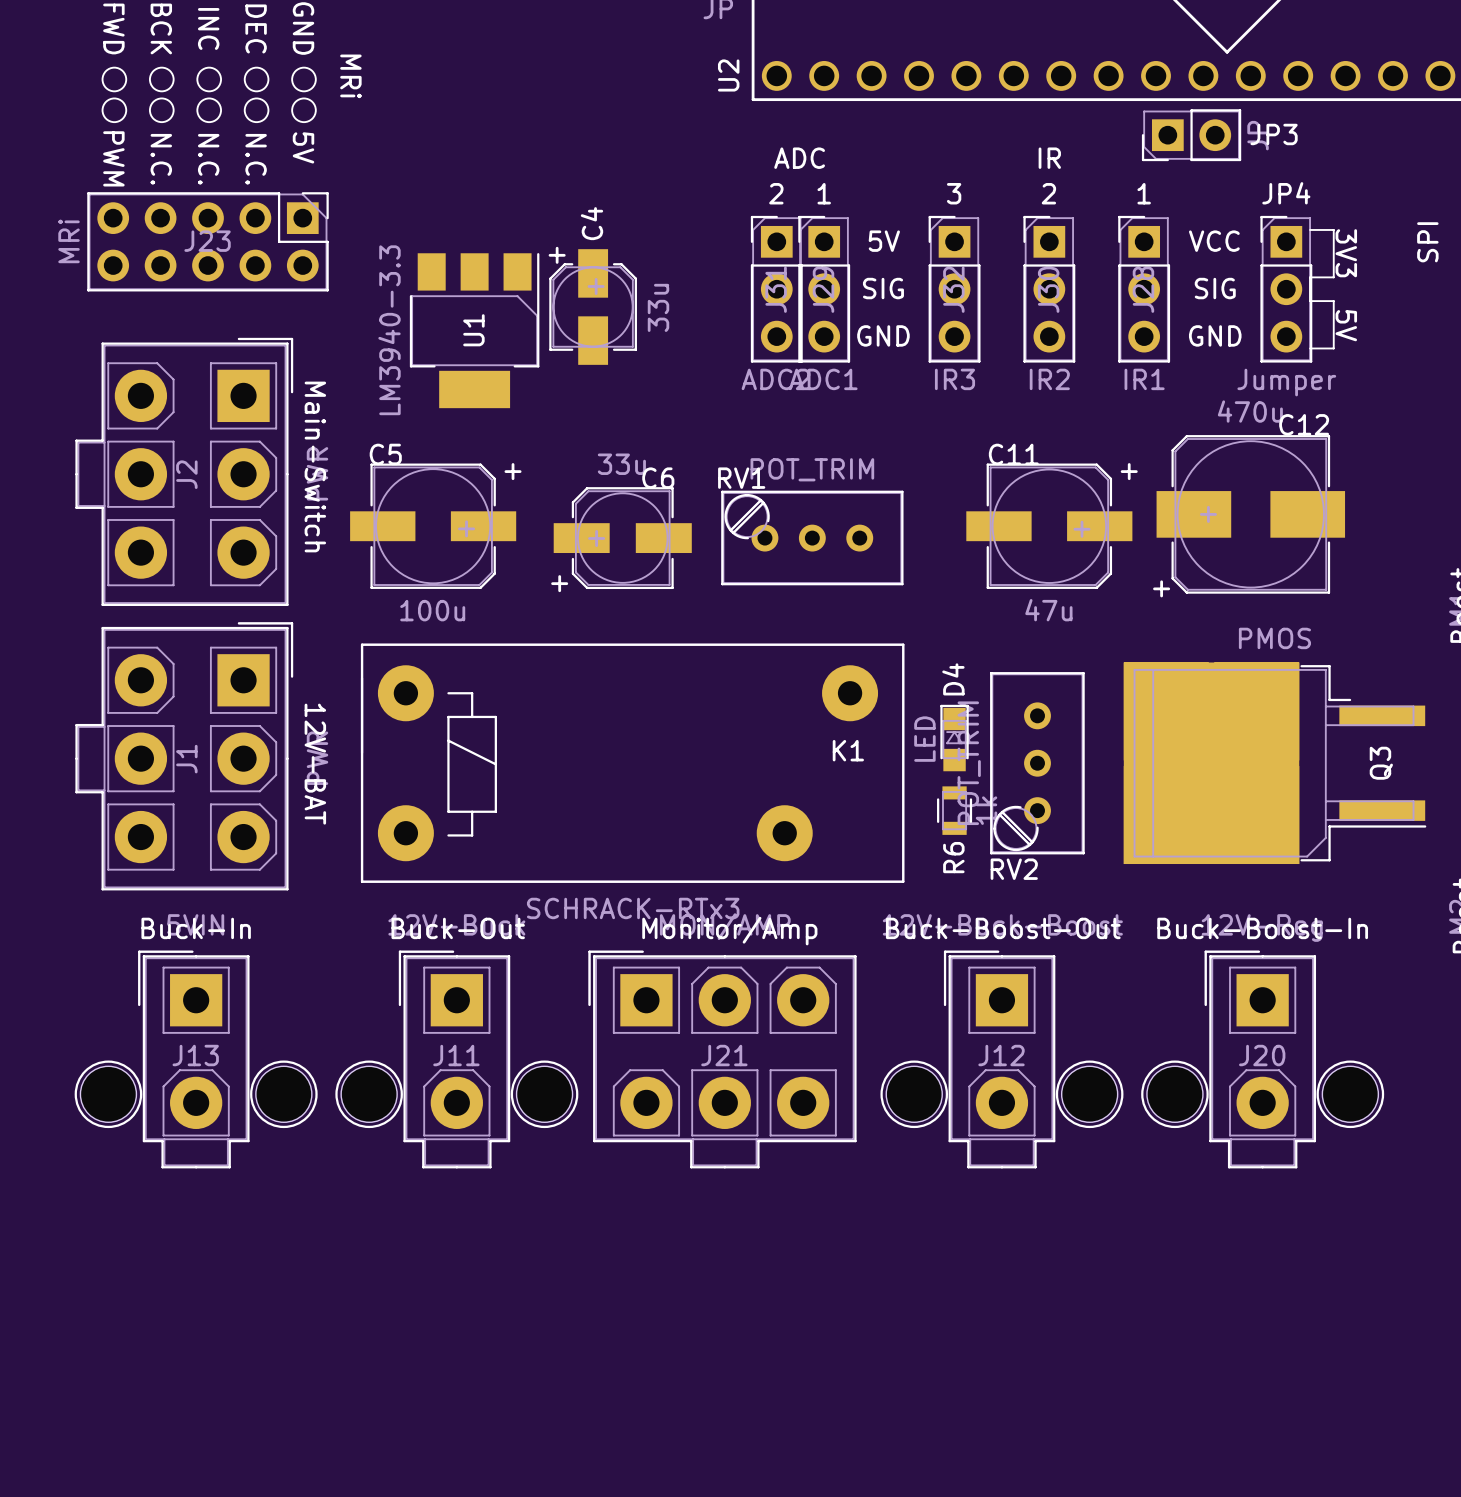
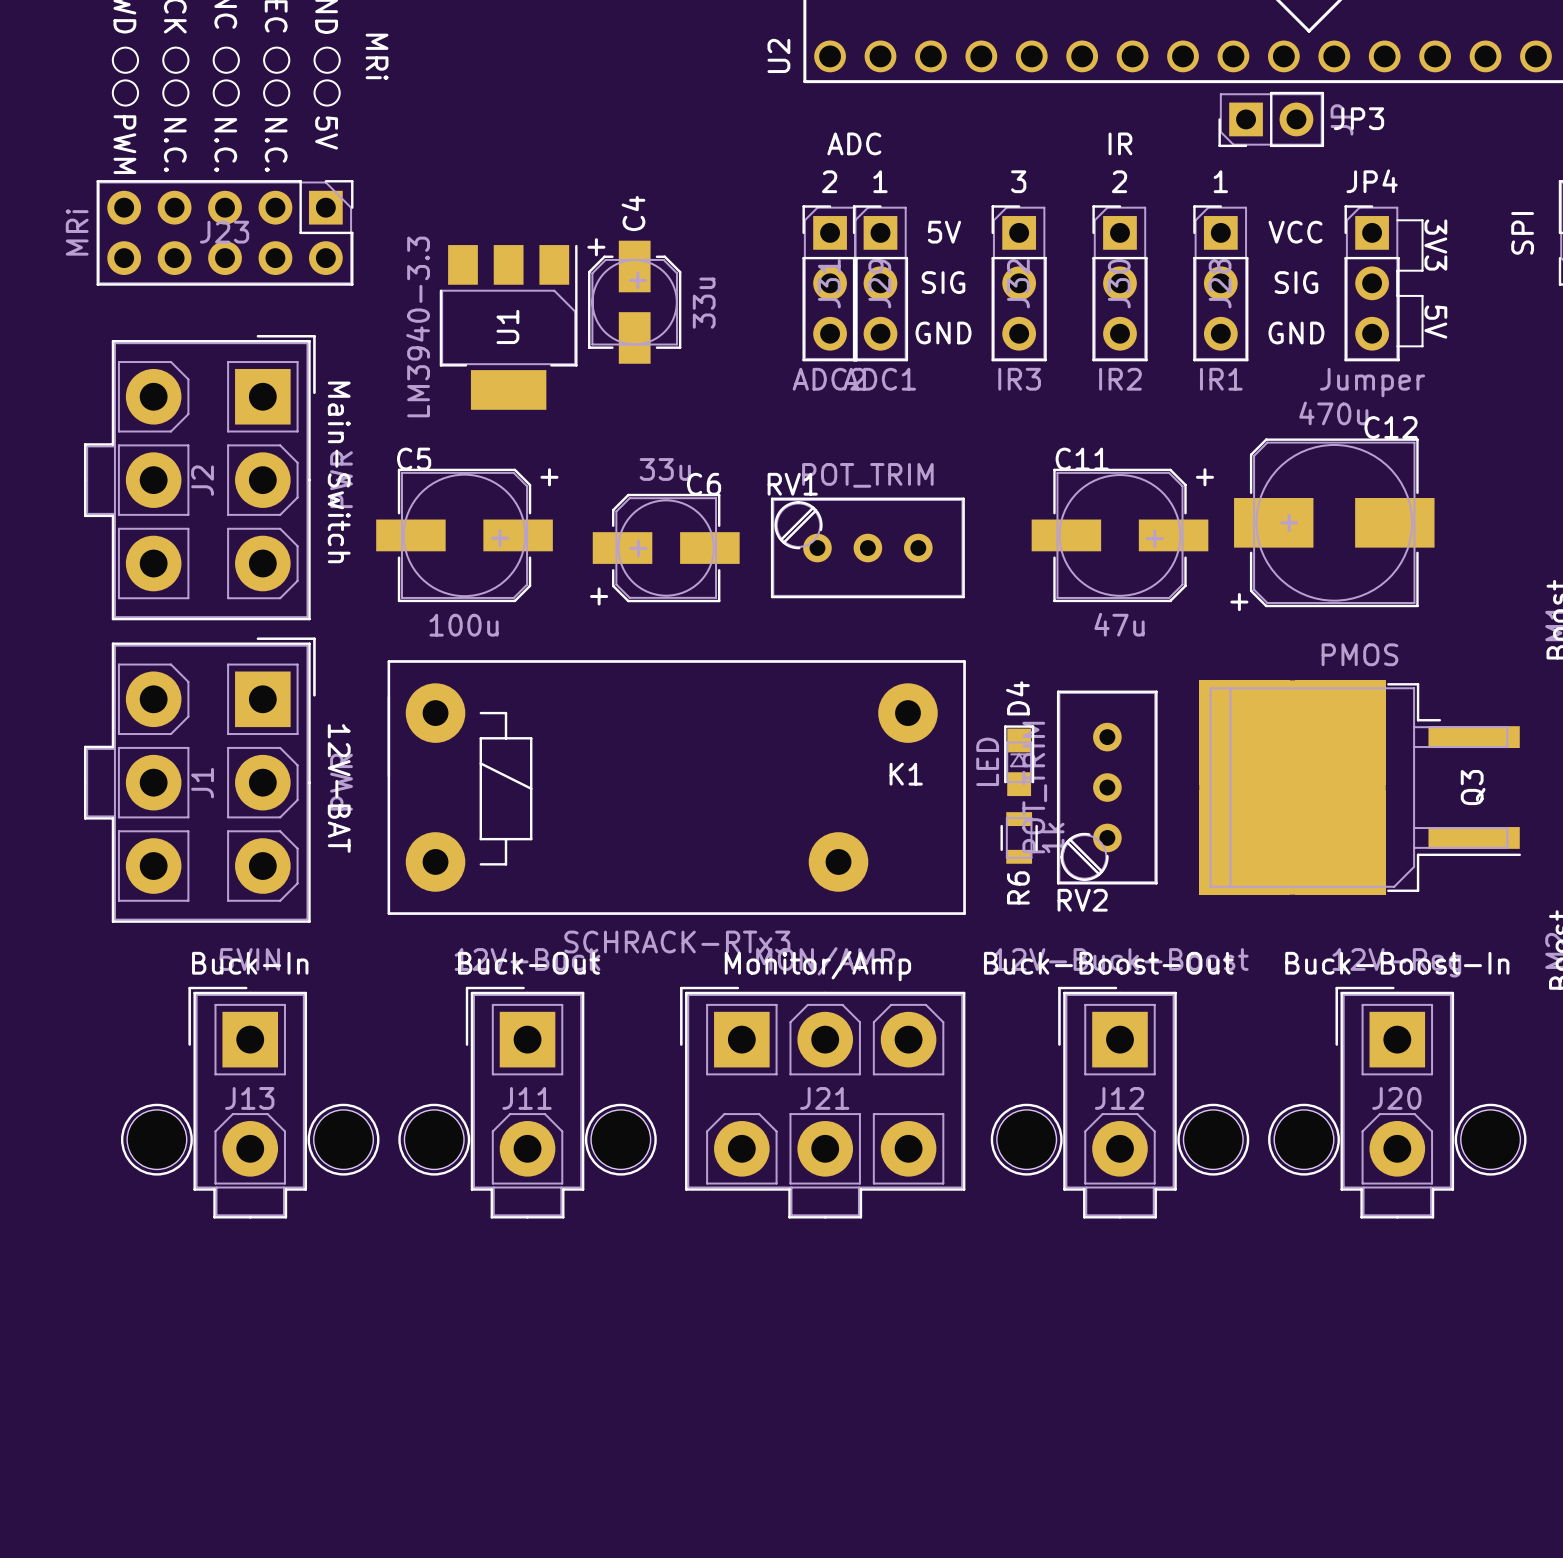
text position: Buck-In (196, 928) -> Buck-In (250, 963)
text position: Buck-Out (458, 928) -> Buck-Out (528, 963)
text position: Buck-Boost-Out (1003, 928) -> Buck-Boost-Out (1108, 963)
text position: Buck-Boost-In (1262, 928) -> Buck-Boost-In (1397, 963)
text position: Monitor/Amp (729, 931) -> Monitor/Amp (817, 966)
J13 position: (196, 1059) -> (250, 1102)
J11 position: (456, 1059) -> (527, 1102)
J21 position: (722, 1059) -> (822, 1102)
J12 position: (1001, 1059) -> (1119, 1102)
J20 position: (1262, 1059) -> (1397, 1102)

